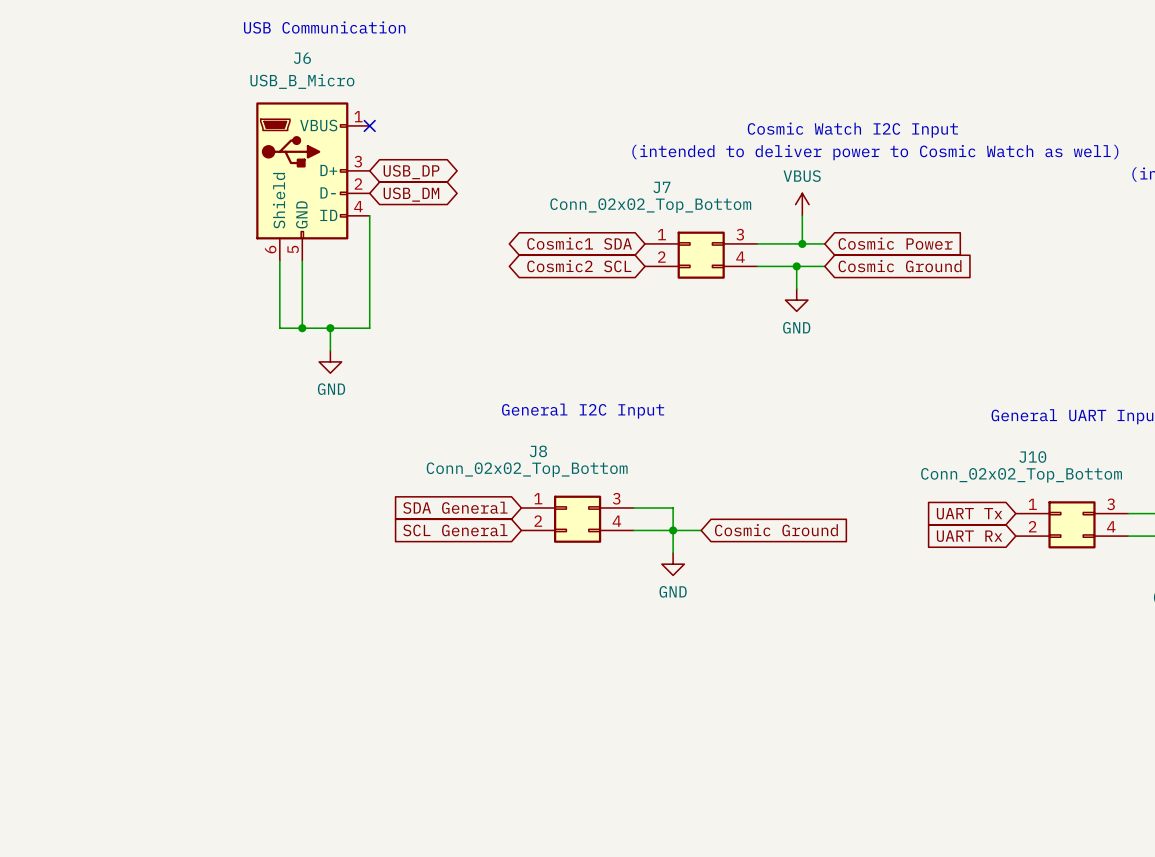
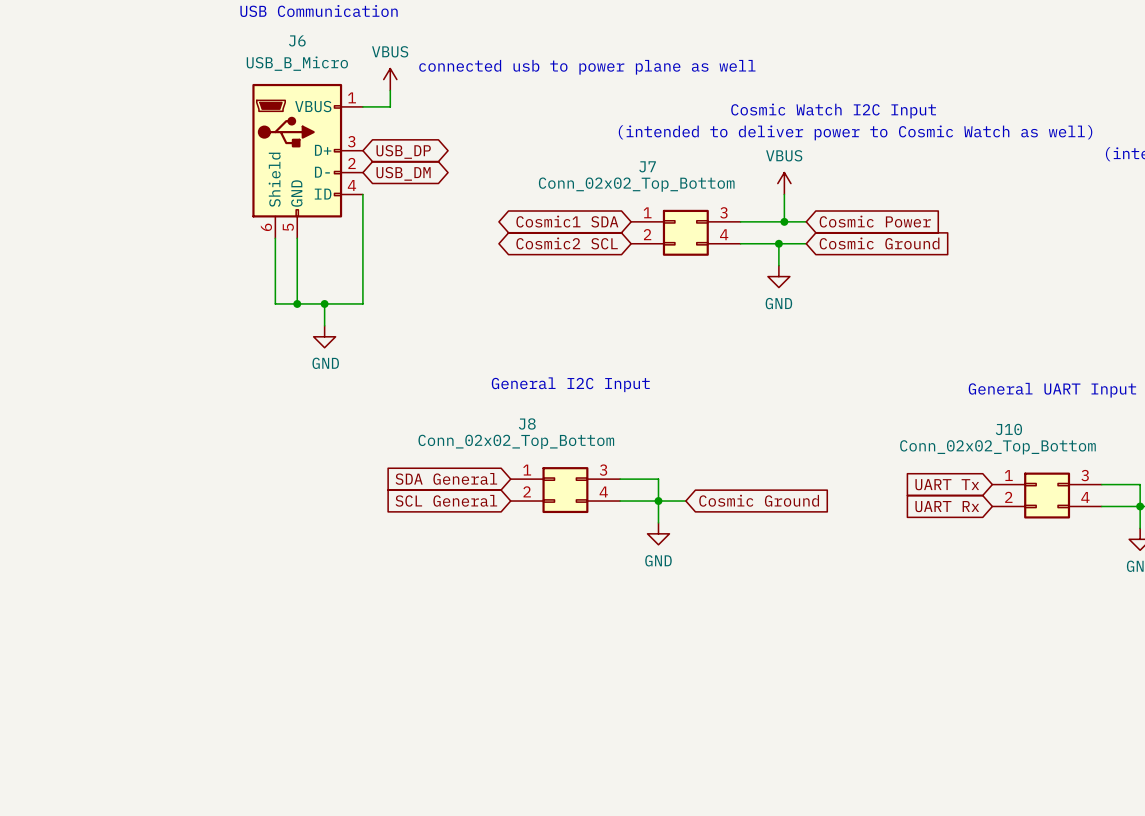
text: none -> connected usb to power plane as well (587, 67)
power symbol: none -> VBUS (390, 79)
wire: none -> (390, 90) (390, 106) (362, 106)
no-connect mark: (369, 125) -> none

